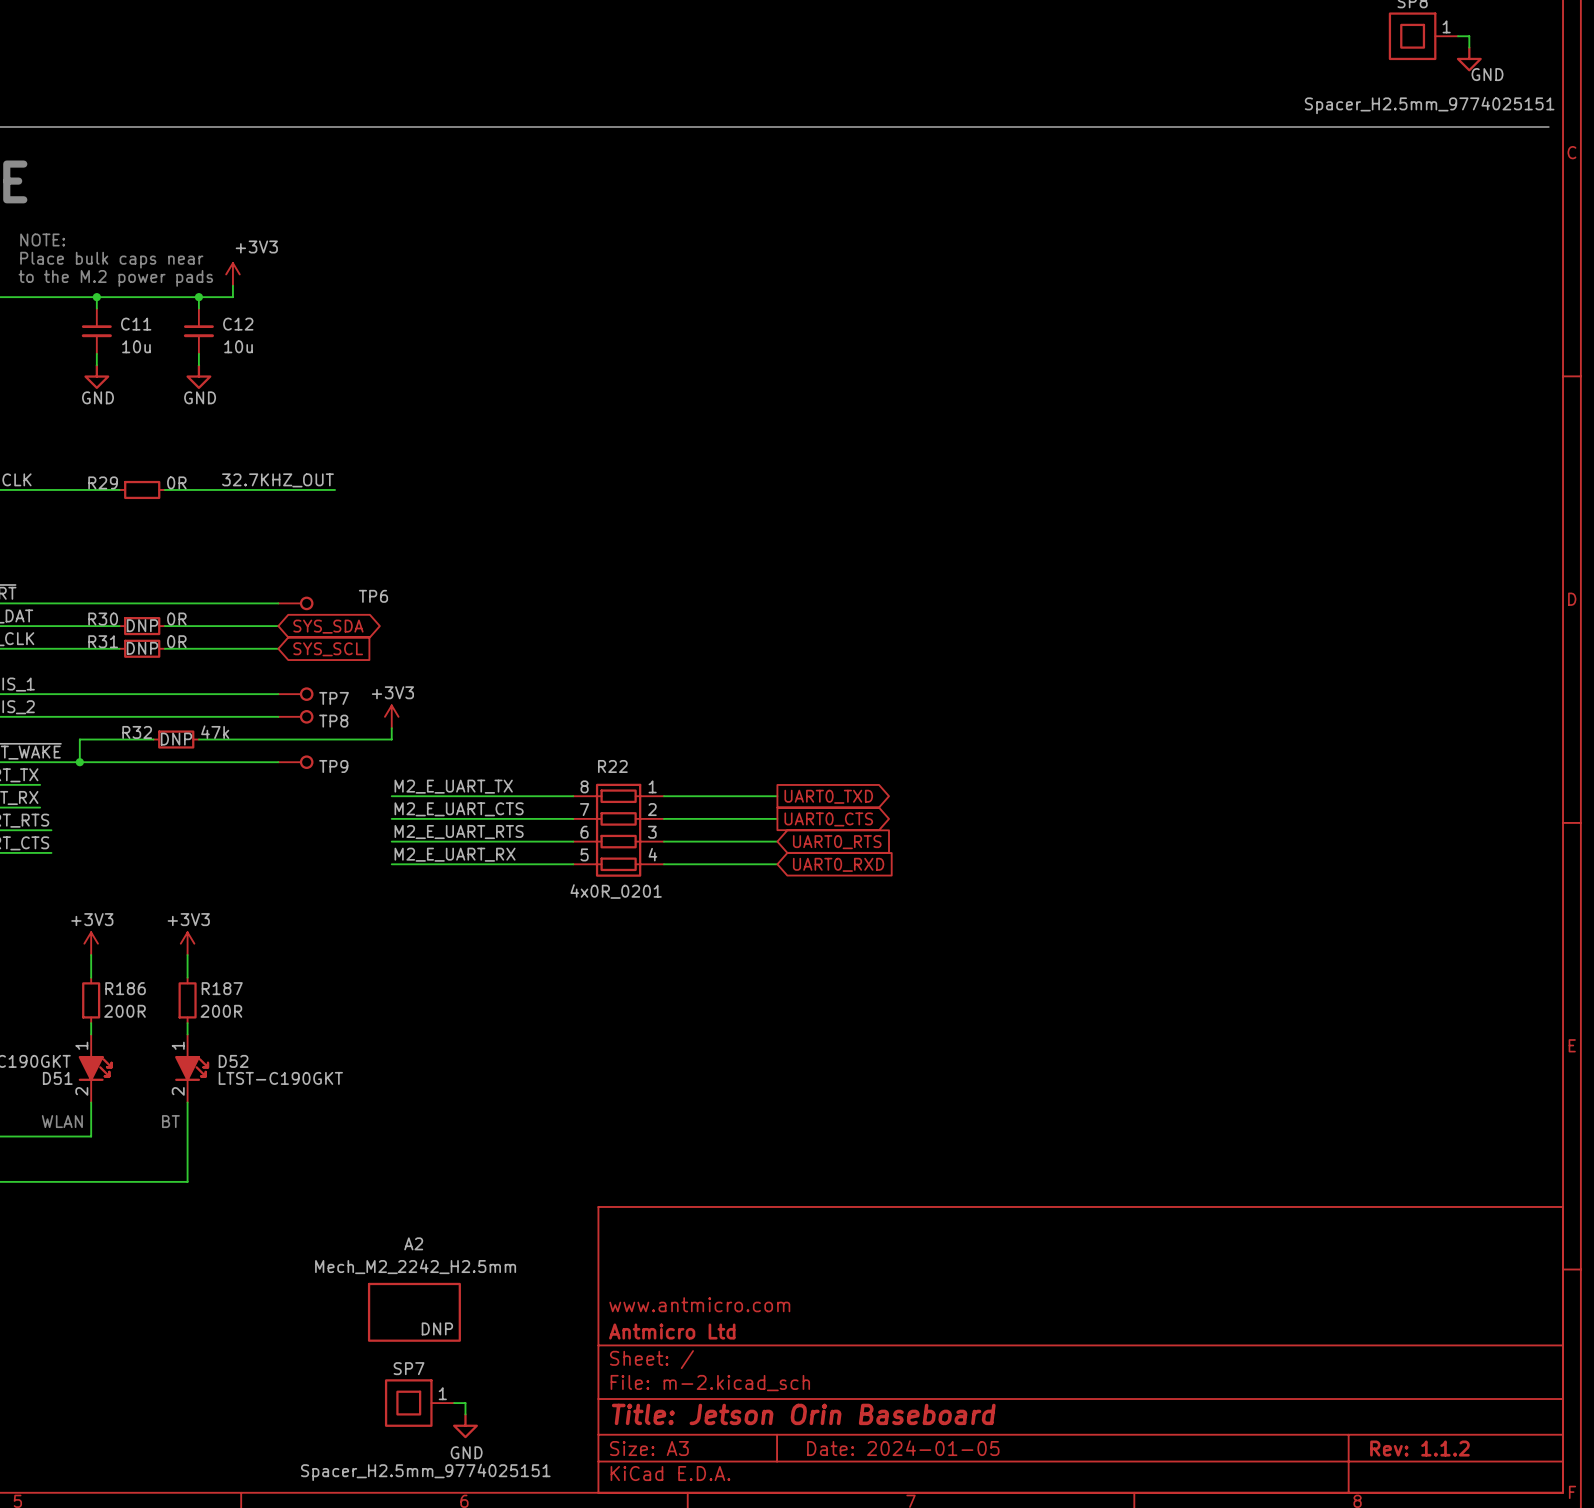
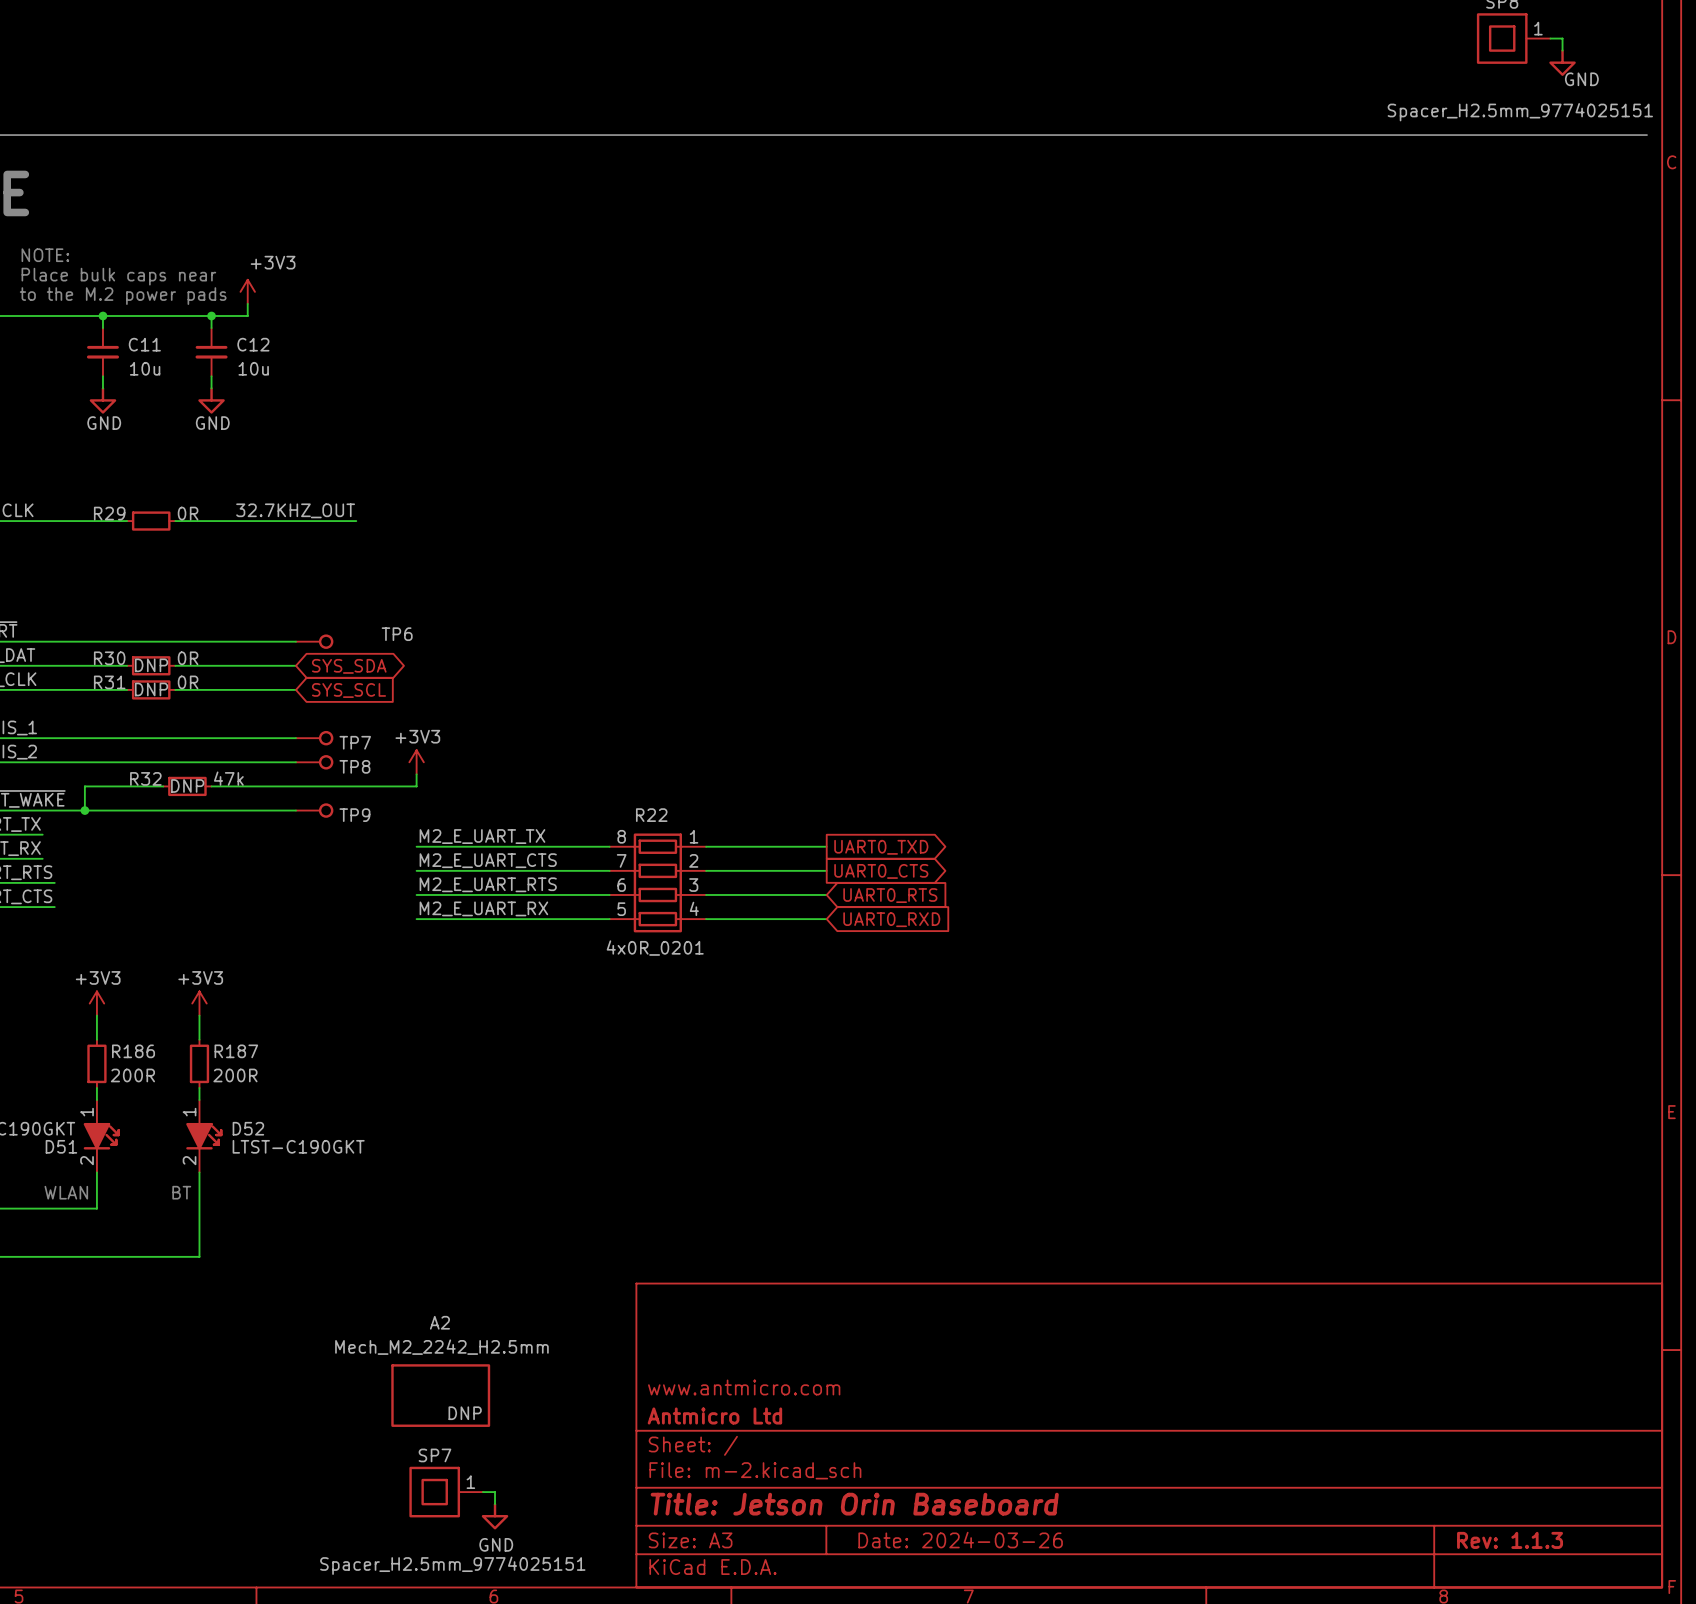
title block: Date: 2024-01-05 (903, 1448) -> Date: 2024-03-26 (960, 1540)
title block: Rev: 1.1.2 (1419, 1448) -> Rev: 1.1.3 (1510, 1540)

